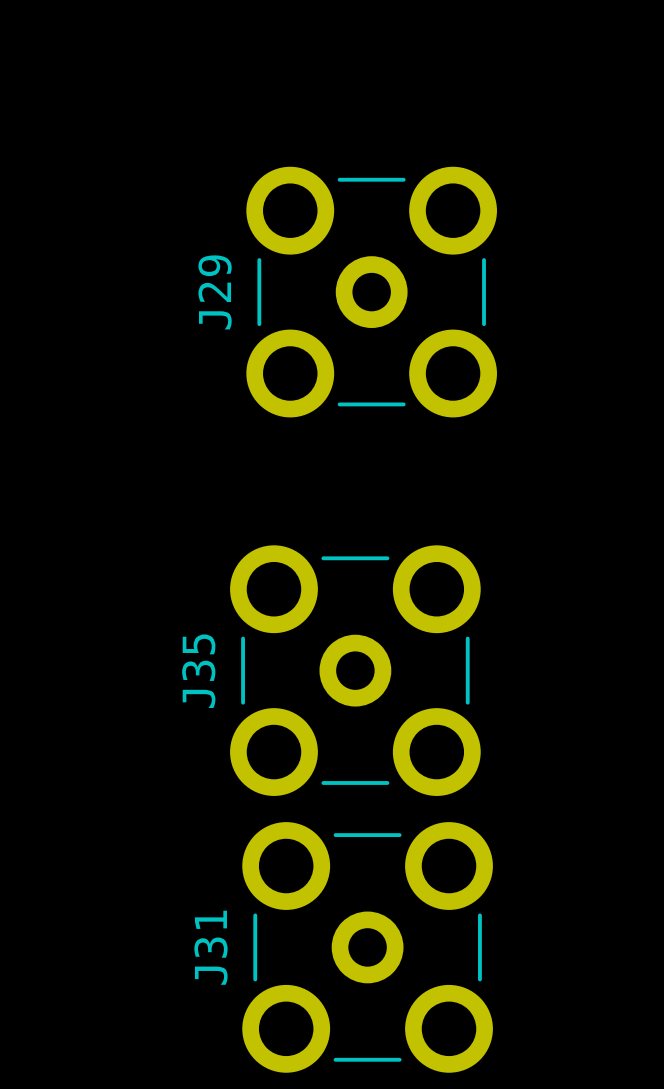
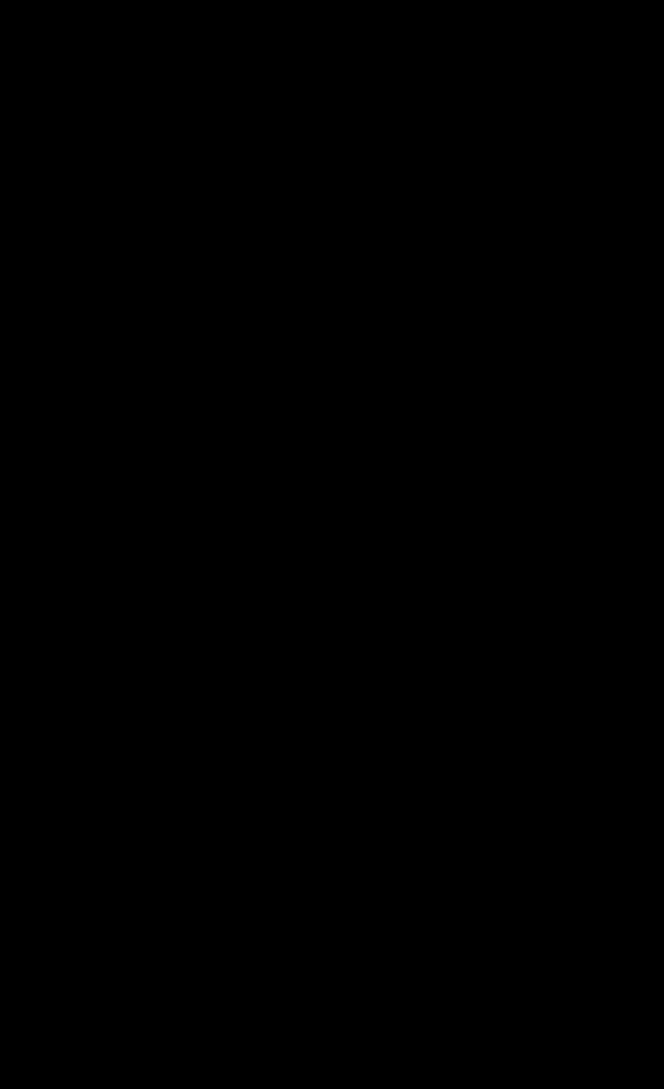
J29: (371, 292) -> none
J35: (355, 670) -> none
J31: (367, 947) -> none

